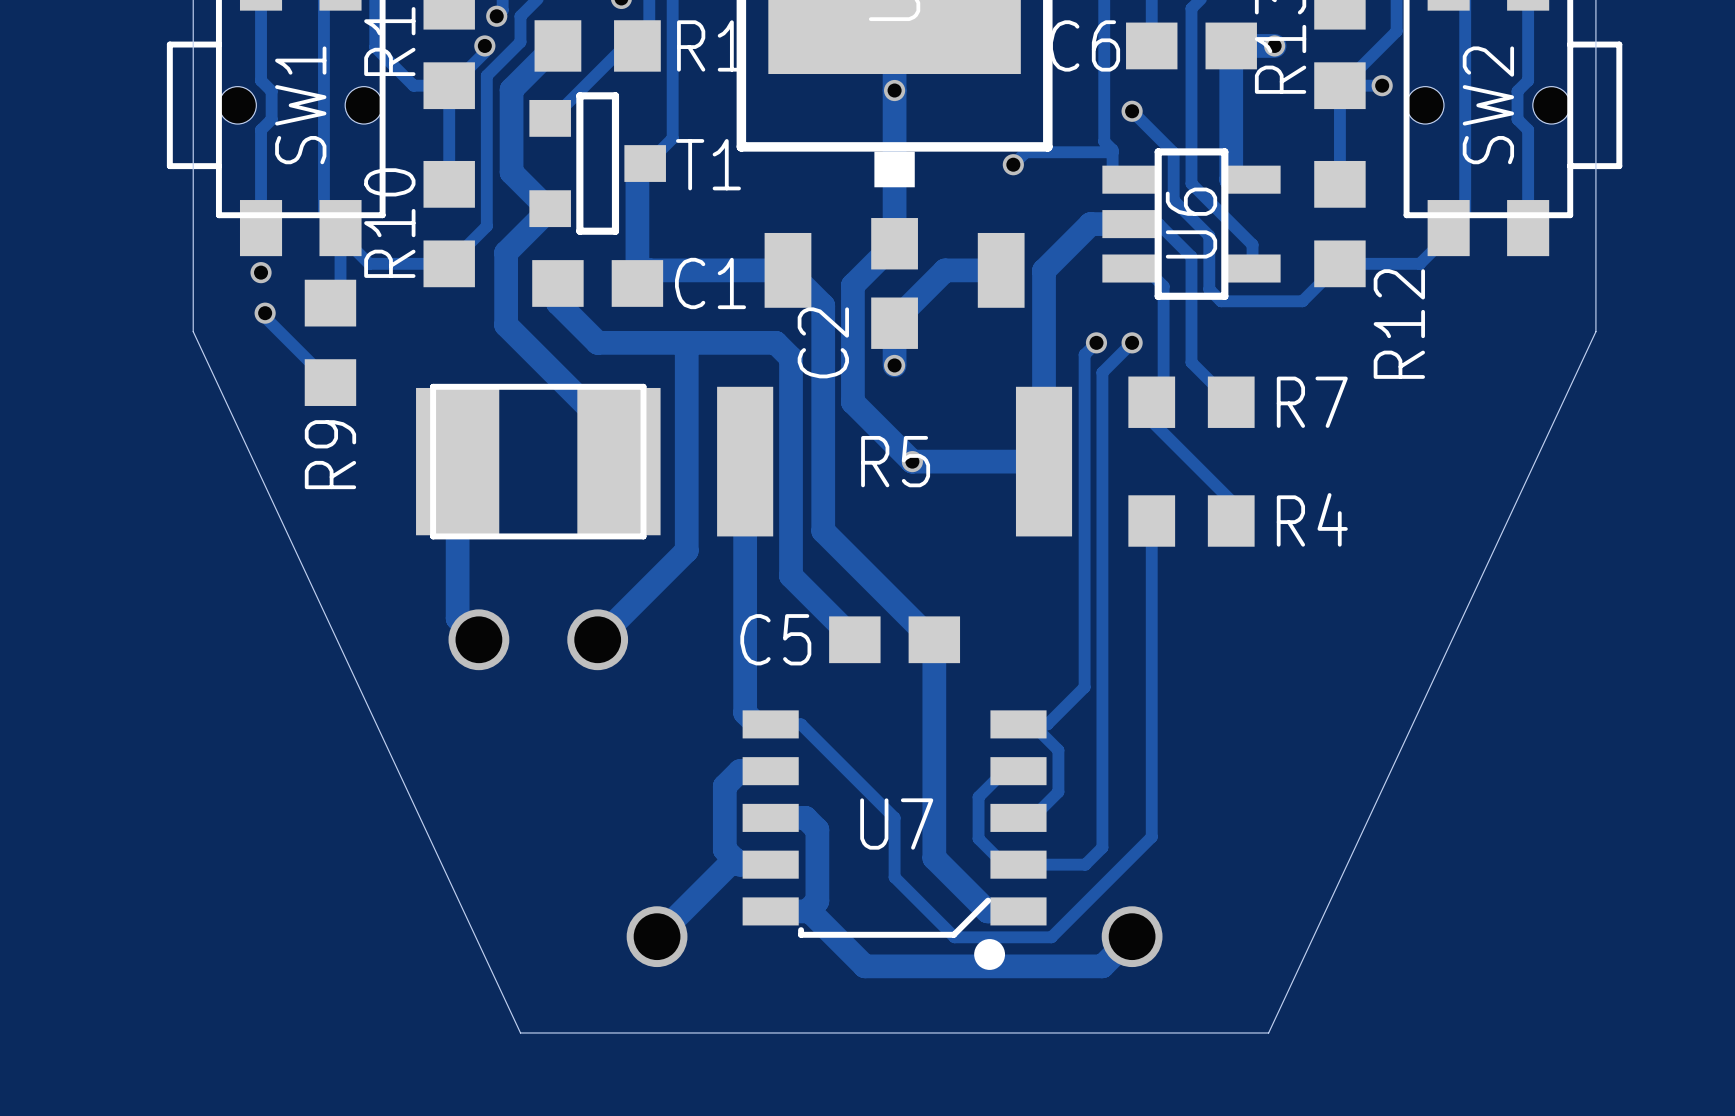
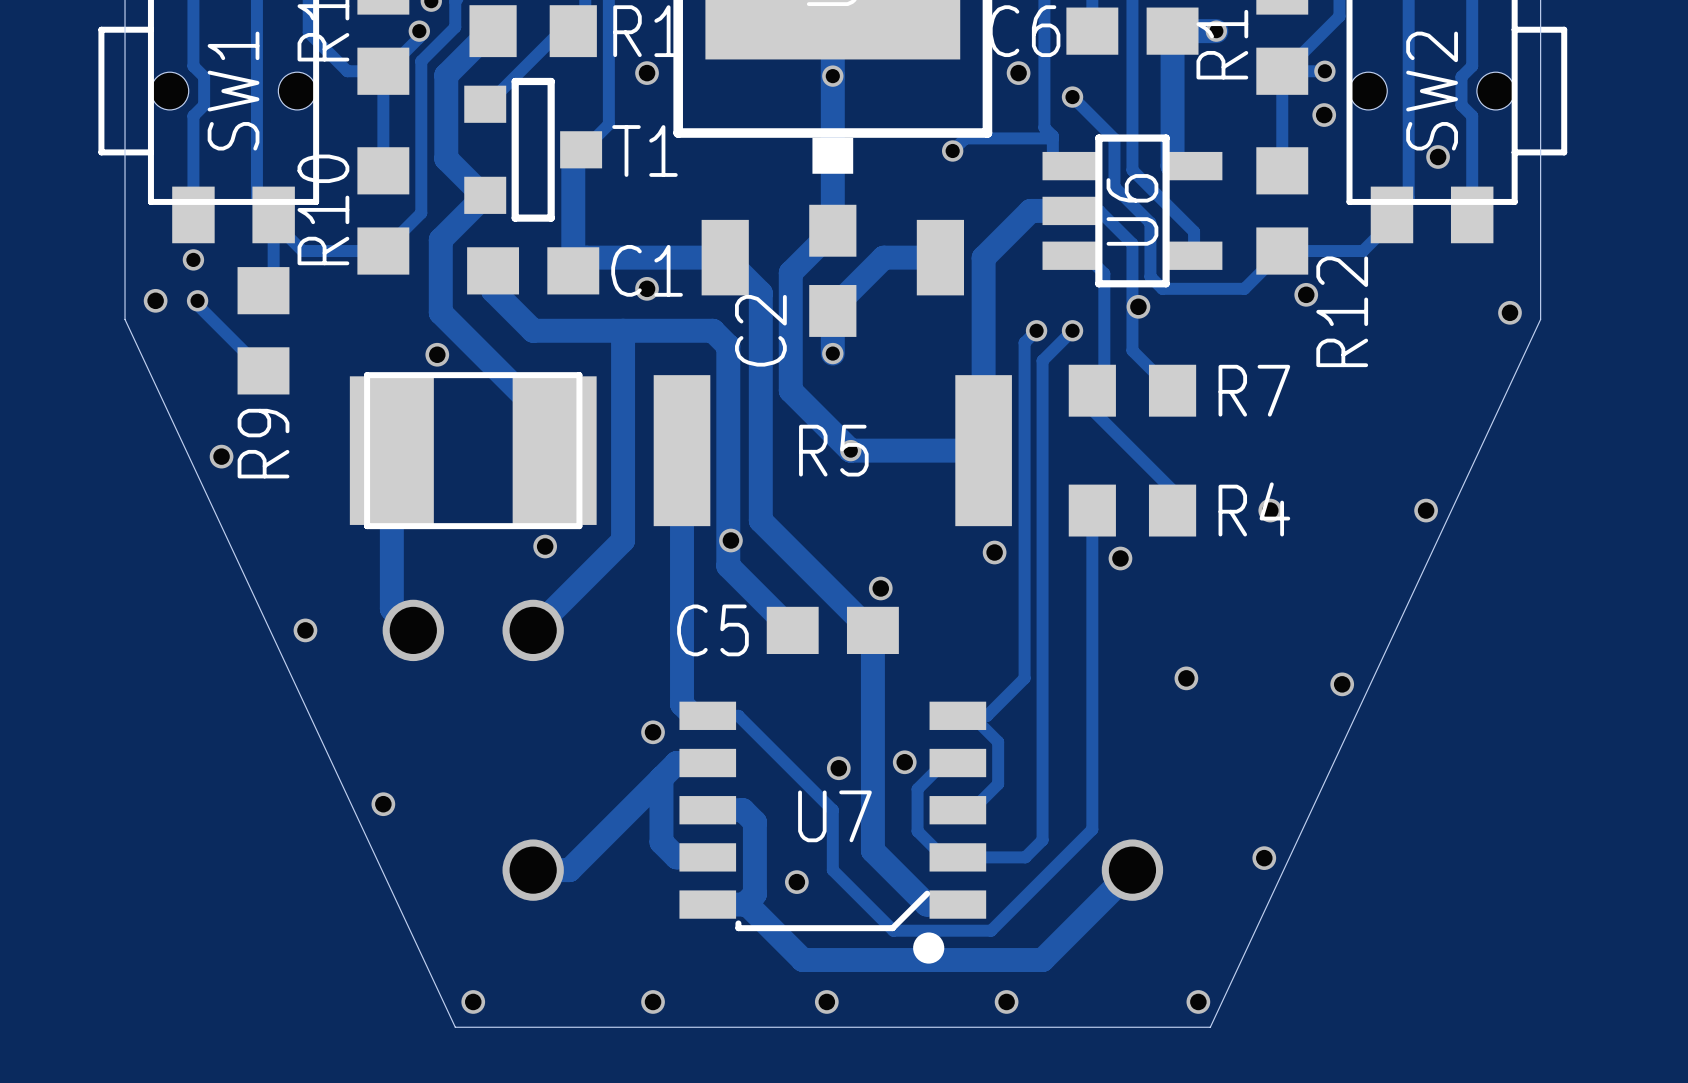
via: none -> (647, 73)
via: none -> (1018, 73)
via: none -> (1324, 115)
via: none -> (1438, 156)
via: none -> (647, 288)
via: none -> (1306, 294)
via: none -> (155, 300)
via: none -> (1138, 306)
via: none -> (1509, 312)
via: none -> (437, 354)
via: none -> (221, 456)
via: none -> (1270, 510)
via: none -> (1426, 510)
via: none -> (730, 540)
via: none -> (545, 546)
via: none -> (994, 552)
via: none -> (1120, 558)
via: none -> (880, 588)
via: none -> (305, 630)
via: none -> (1186, 678)
via: none -> (1342, 684)
via: none -> (653, 732)
via: none -> (904, 762)
via: none -> (838, 768)
track: none -> (661, 778) (569, 870) (533, 870)
via: none -> (383, 804)
track: (734, 859) (657, 936) -> none
via: none -> (1264, 858)
track: none -> (1132, 870) (1072, 930)
via: none -> (796, 882)
via position: (657, 936) -> (533, 870)
via position: (1132, 936) -> (1132, 870)
via: none -> (473, 1001)
via: none -> (653, 1001)
via: none -> (826, 1001)
via: none -> (1006, 1001)
via: none -> (1198, 1001)

